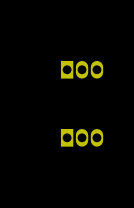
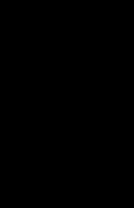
part: (82, 69) -> none
part: (82, 137) -> none

